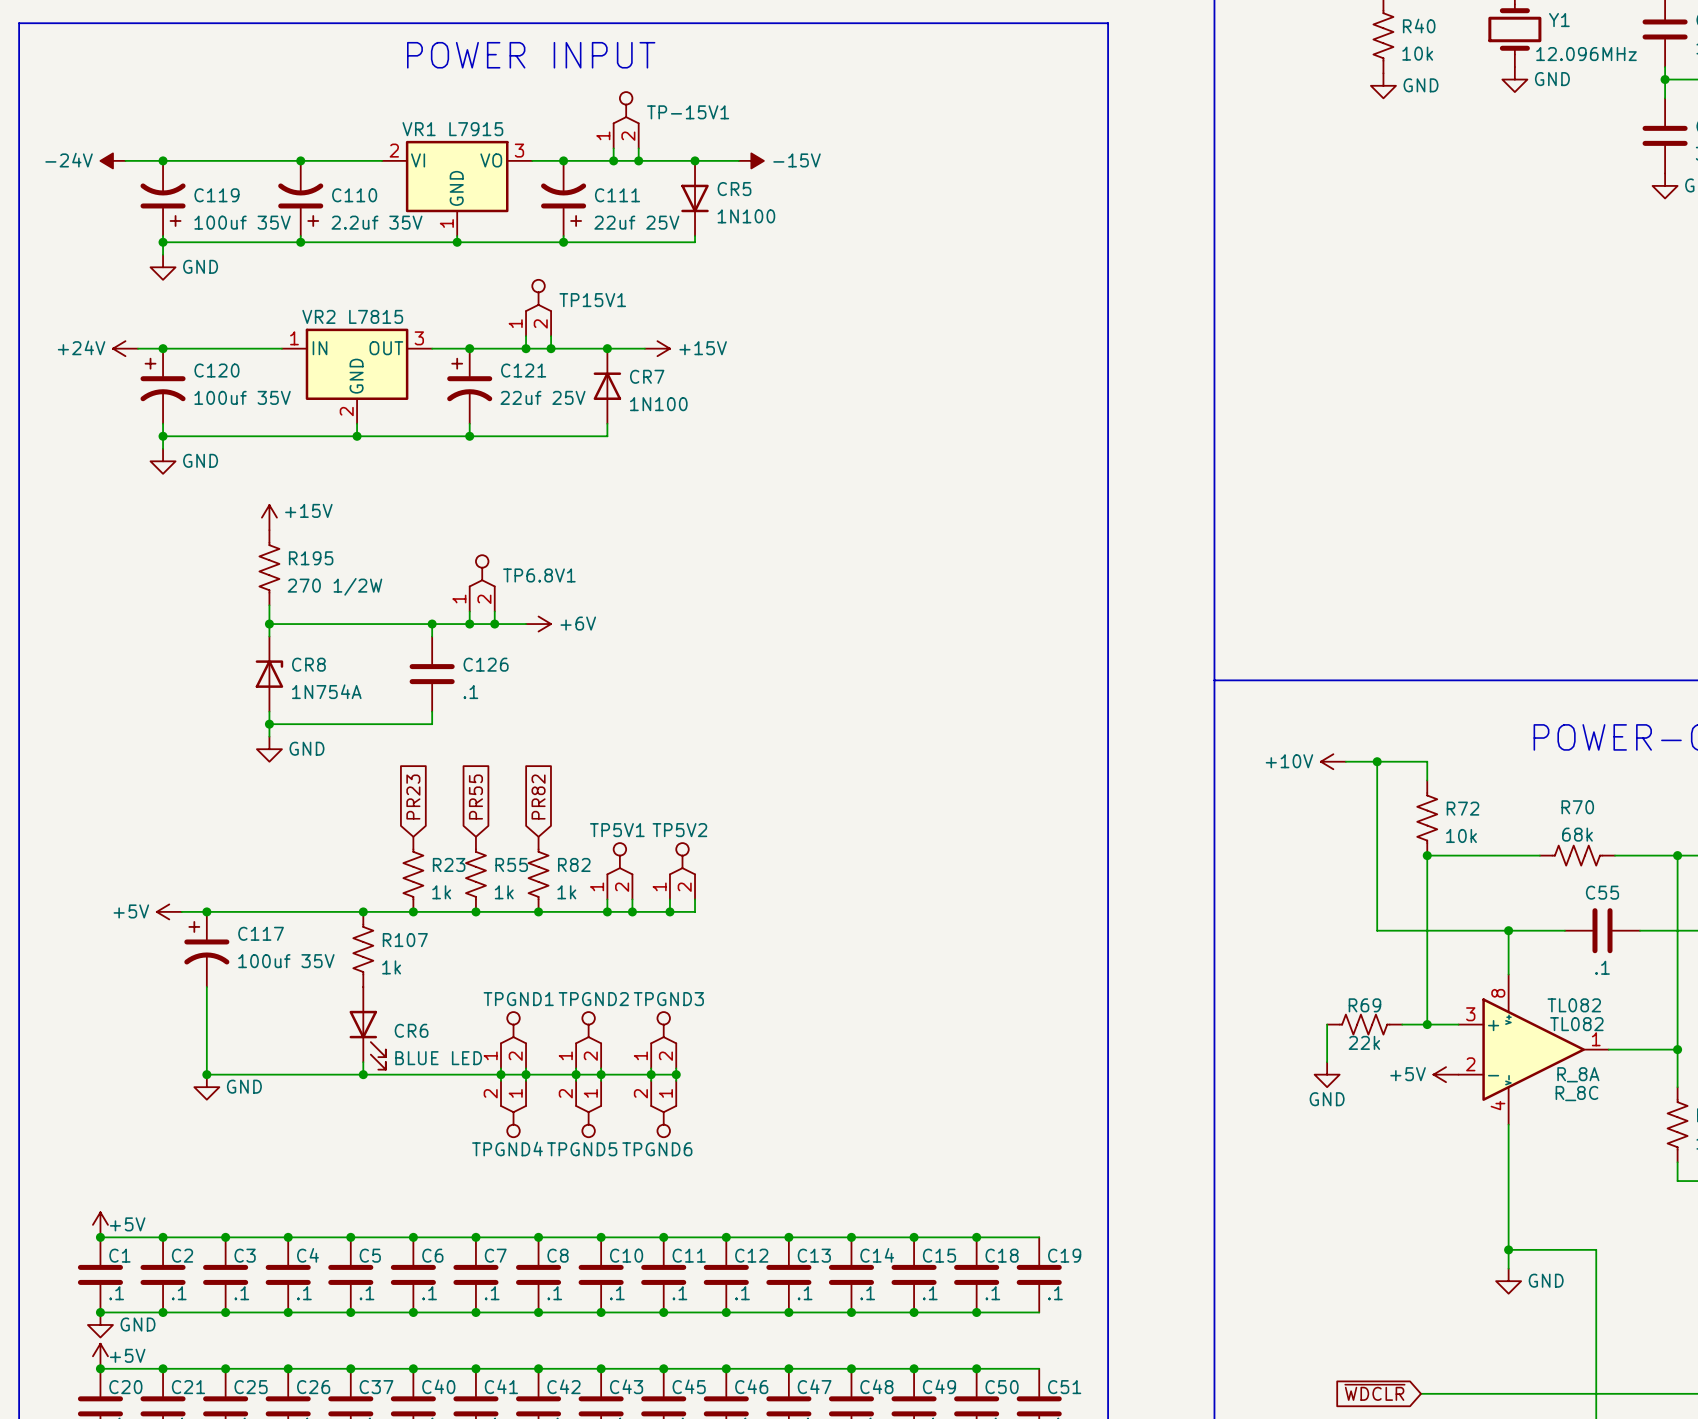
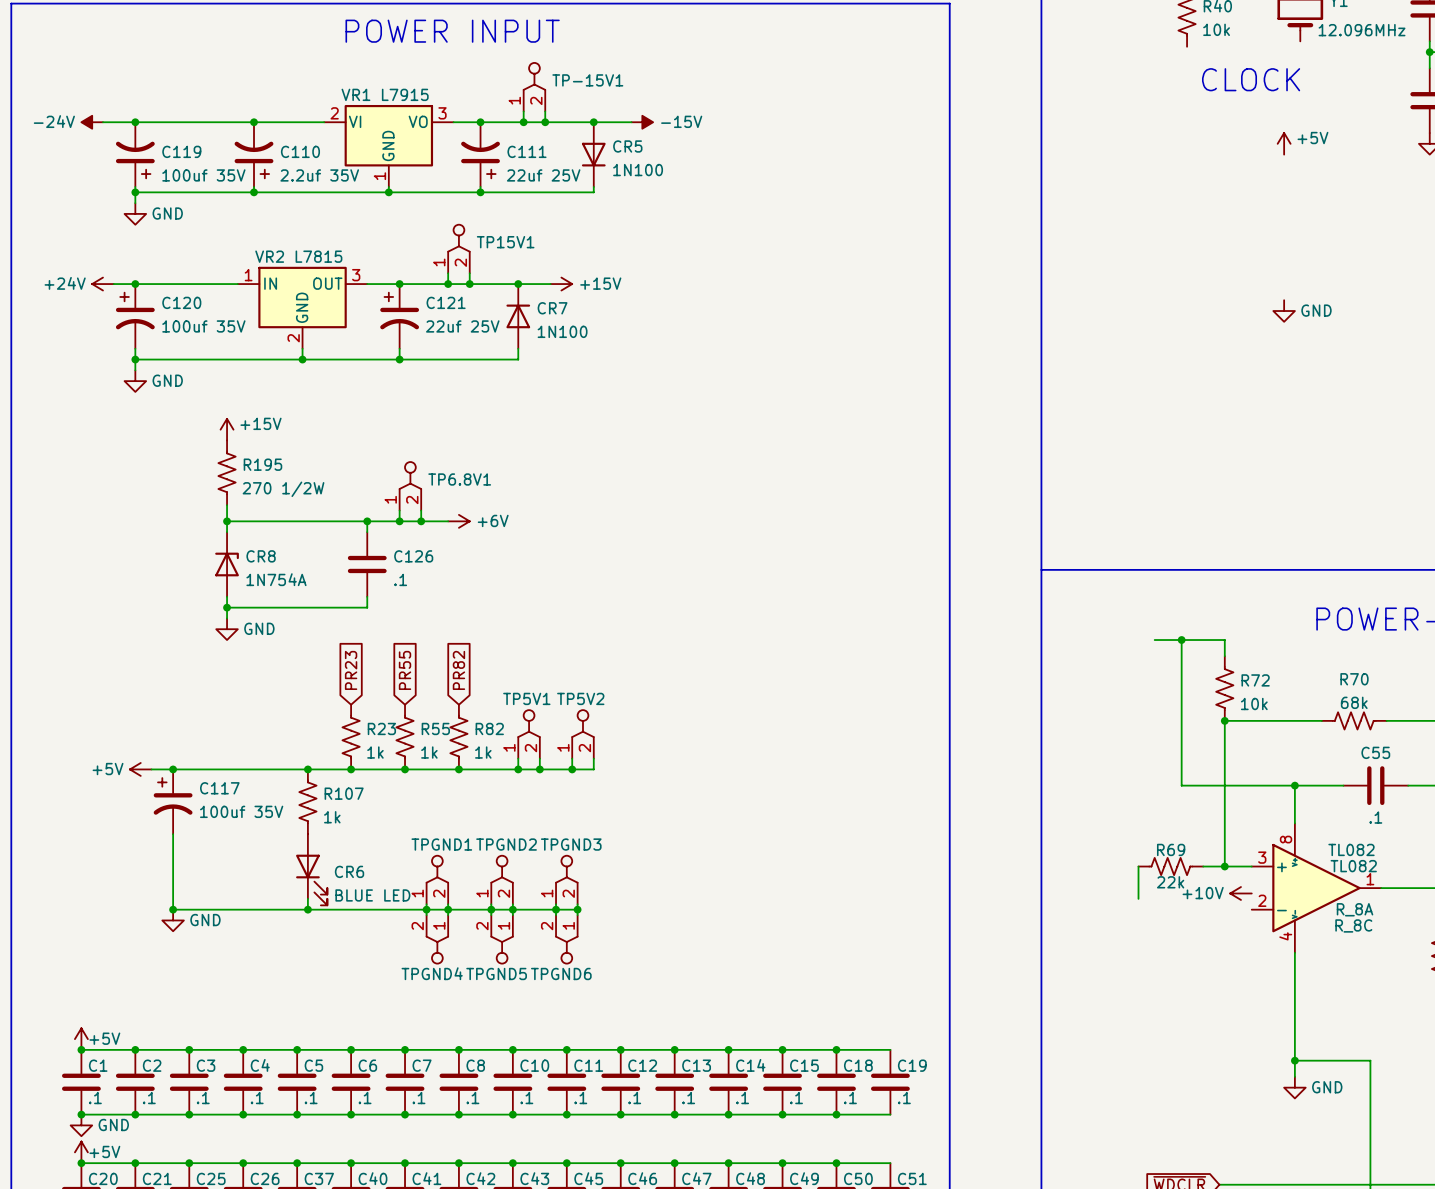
power symbol: GND (1514, 79) -> none
power symbol: GND (1383, 85) -> none
text: none -> CLOCK (1251, 79)
power symbol: none -> +5V (1284, 143)
power symbol: none -> GND (1284, 311)
power symbol: +10V (1333, 761) -> none
power symbol: none -> +10V (1240, 893)
power symbol: GND (1327, 1074) -> none
power symbol: +5V (1446, 1074) -> none

